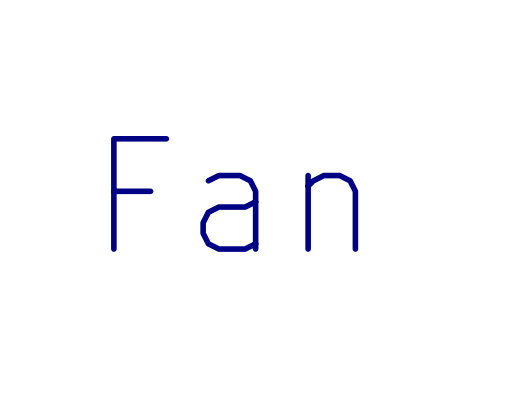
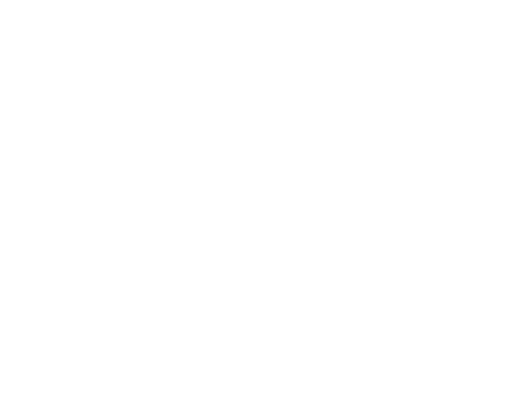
text: Fan (234, 193) -> none

